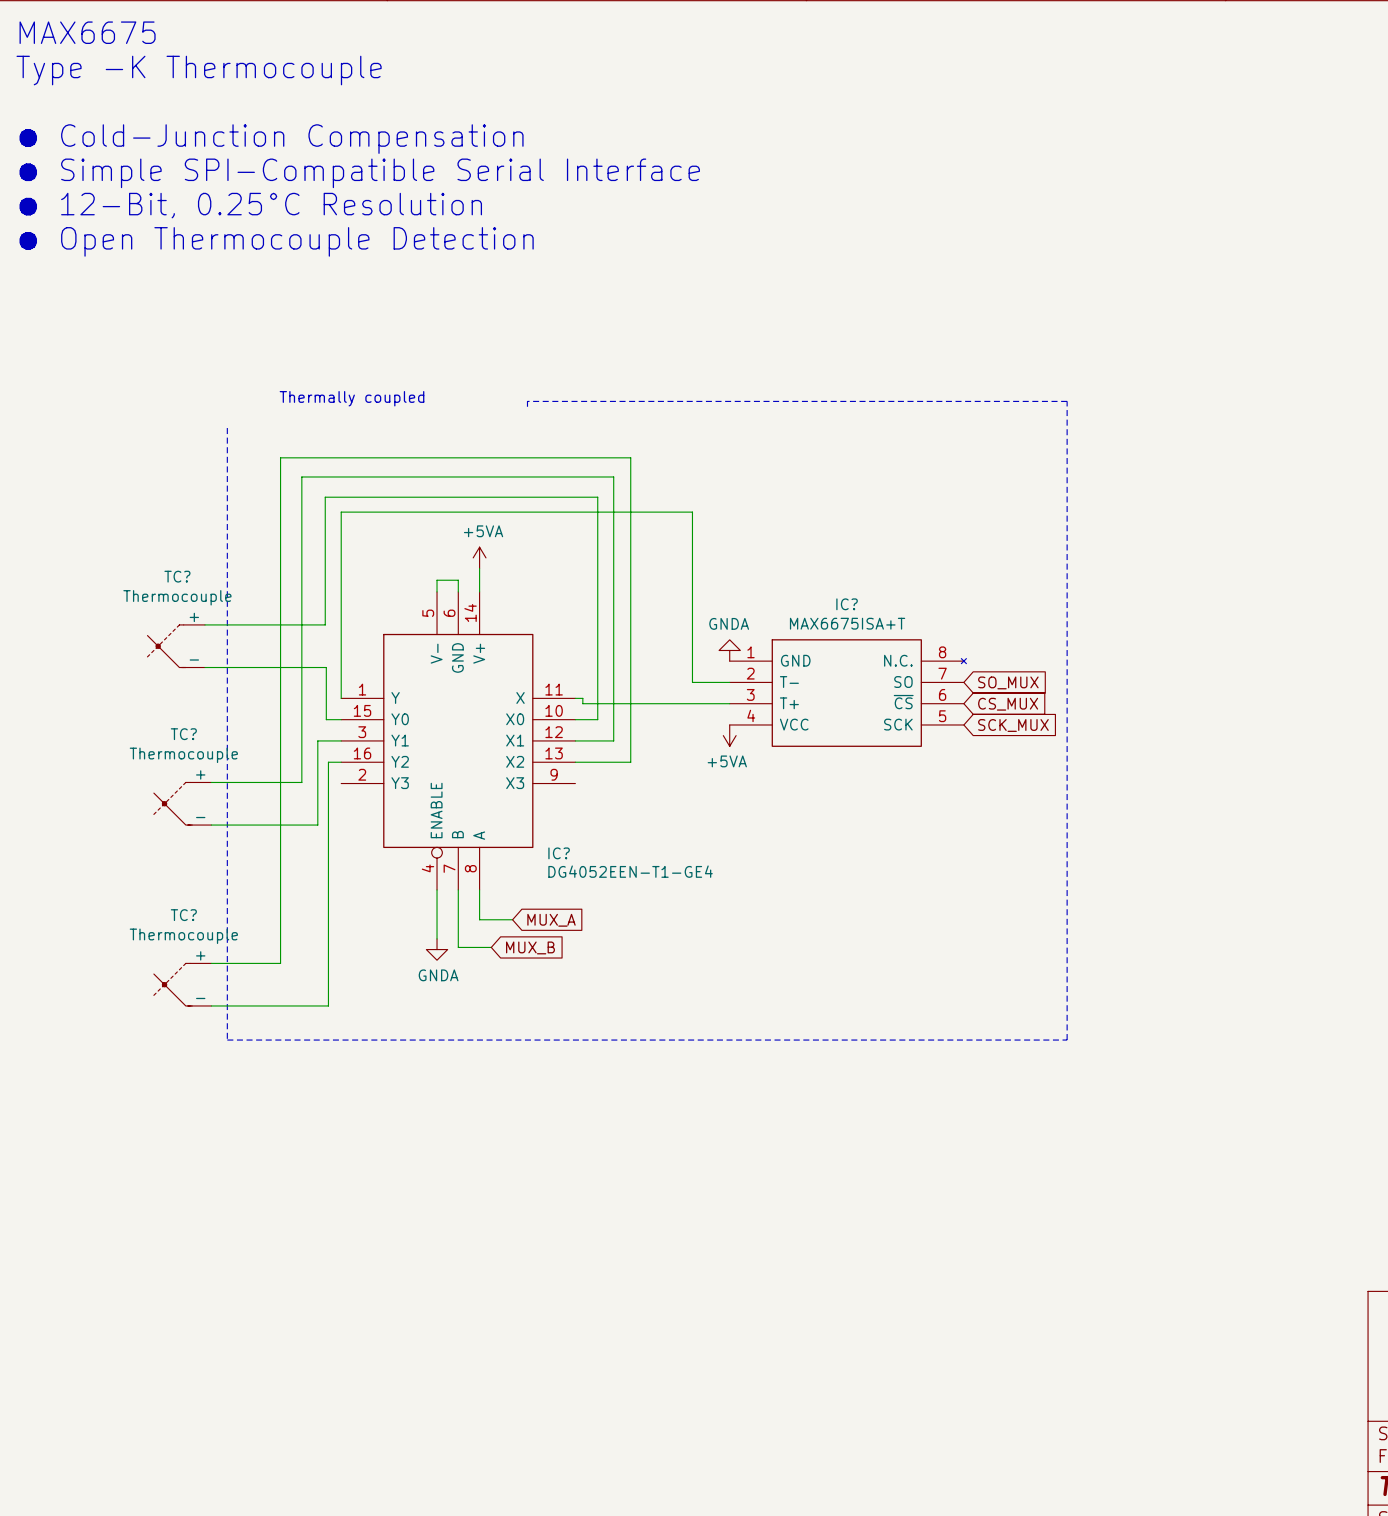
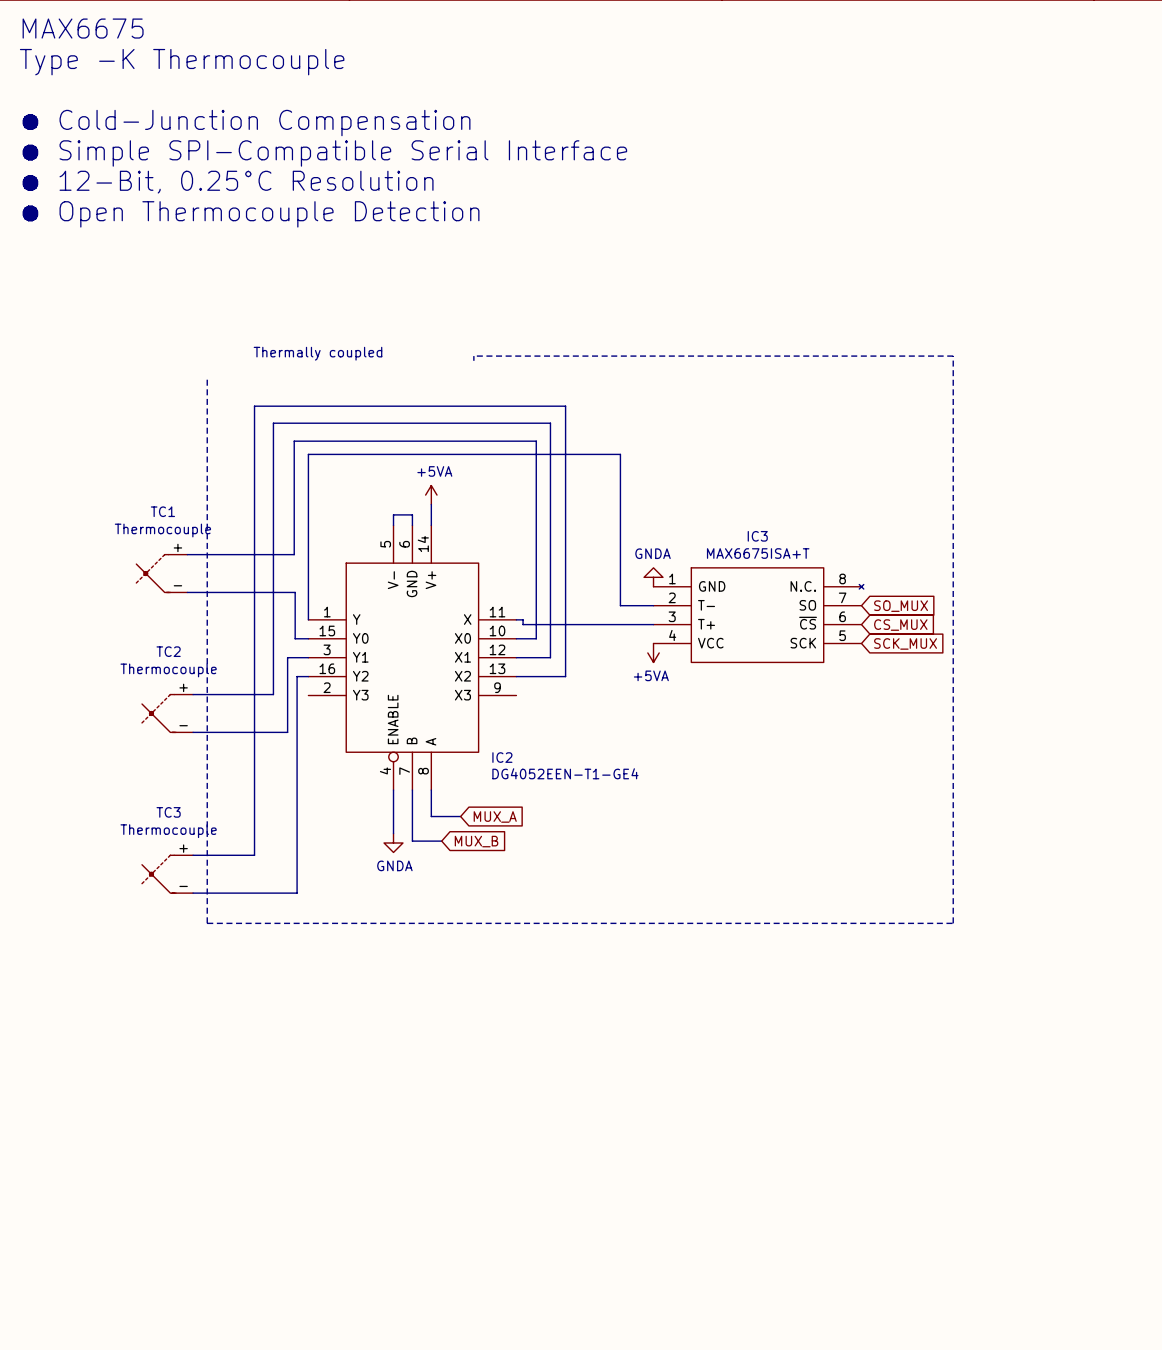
TC? name: TC? (177, 576) -> TC1 (162, 511)
IC? name: IC? (847, 604) -> IC3 (757, 536)
TC? name: TC? (183, 734) -> TC2 (168, 651)
IC? name: IC? (559, 853) -> IC2 (502, 757)
TC? name: TC? (183, 915) -> TC3 (168, 812)

